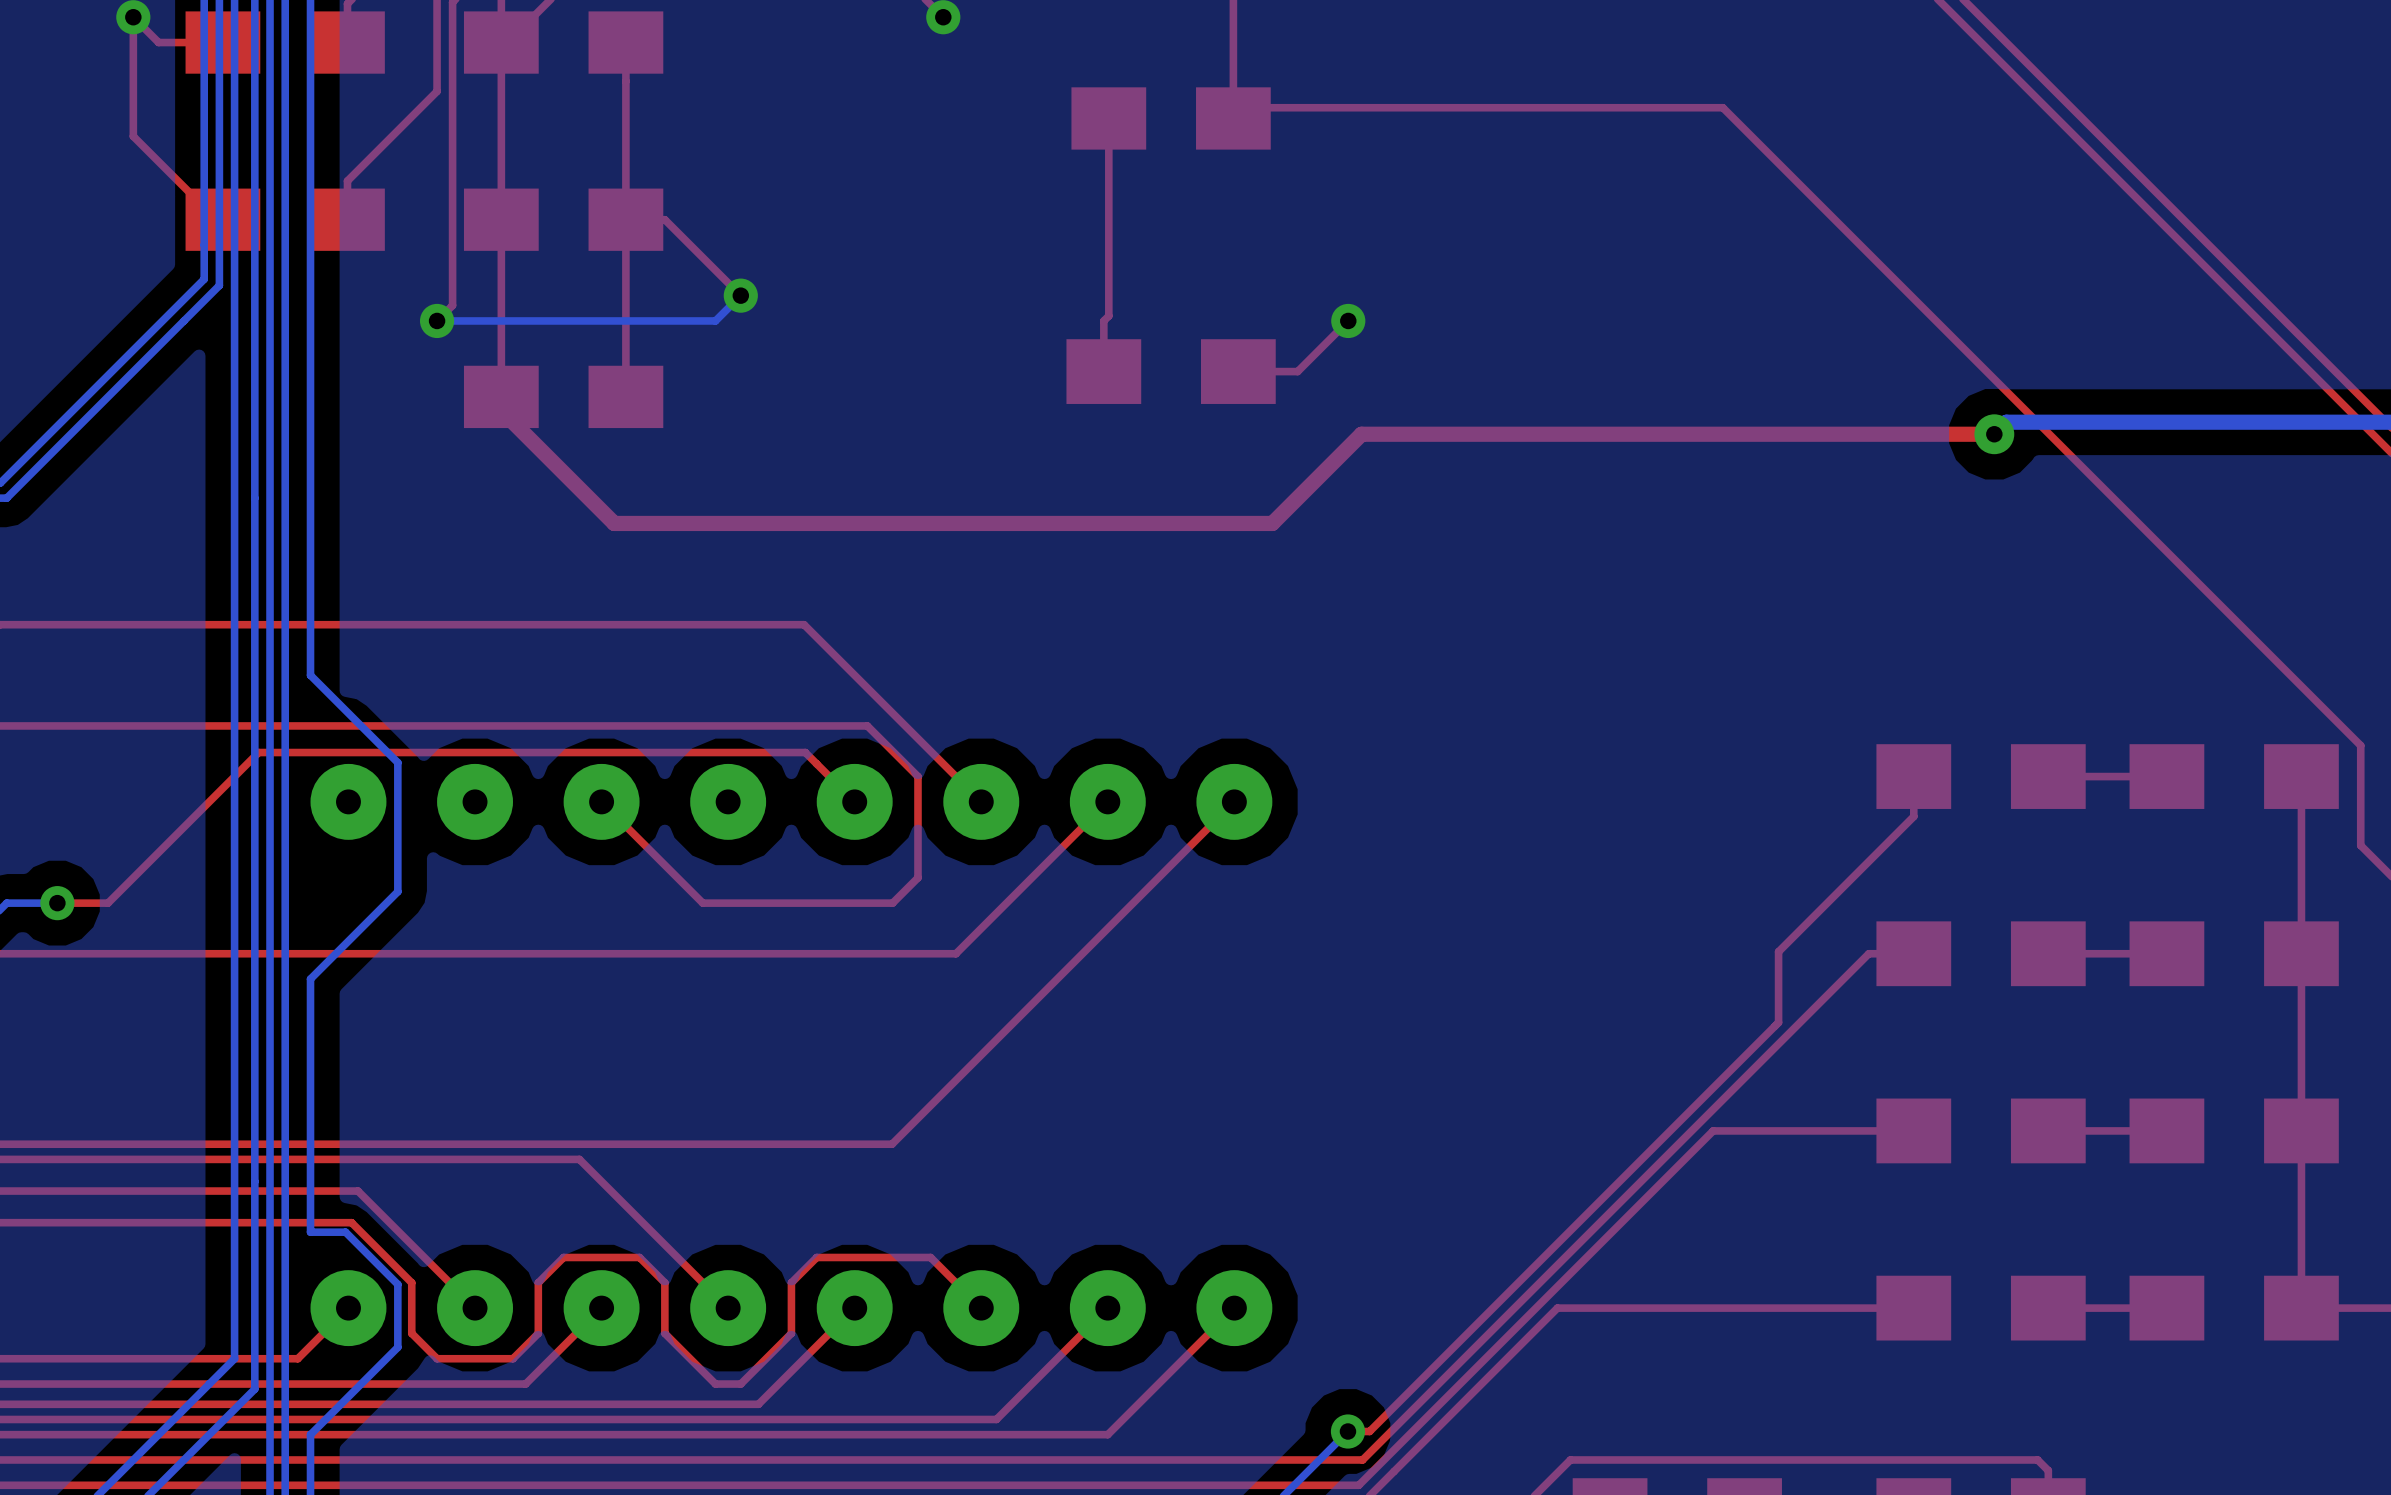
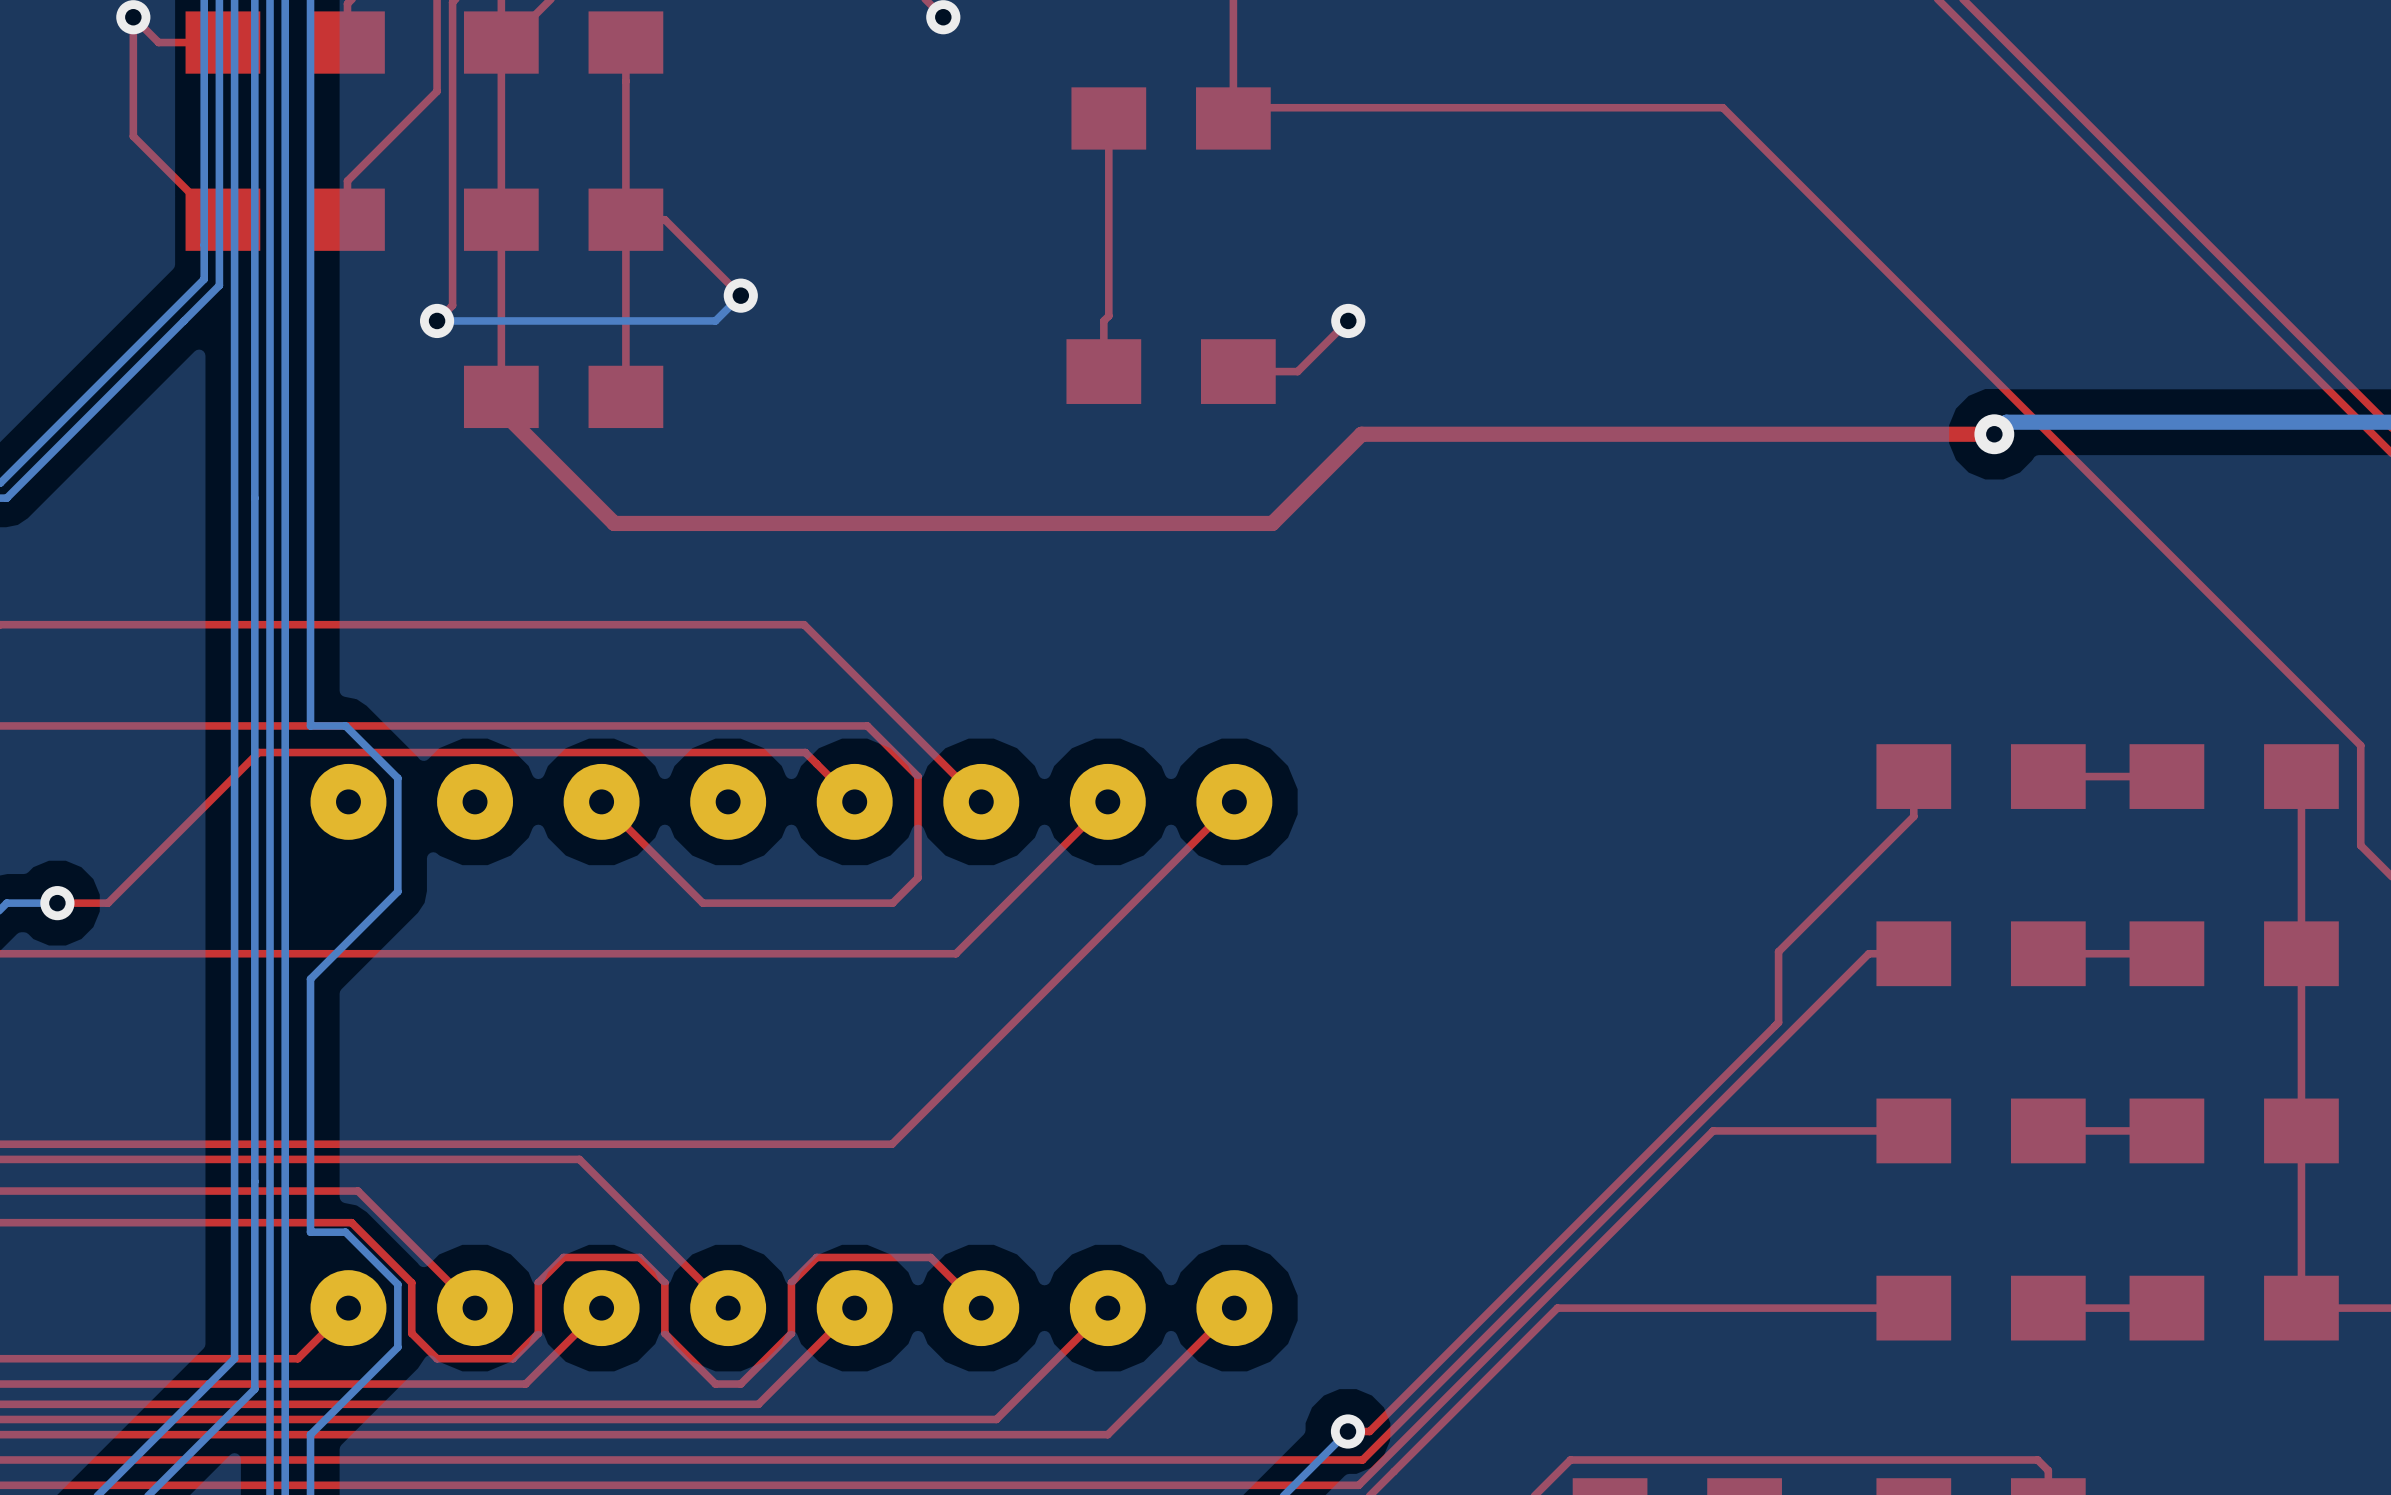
bottom track: (310, 675) (397, 762) (397, 778) -> (310, 675) (310, 725) (345, 725) (397, 778)

